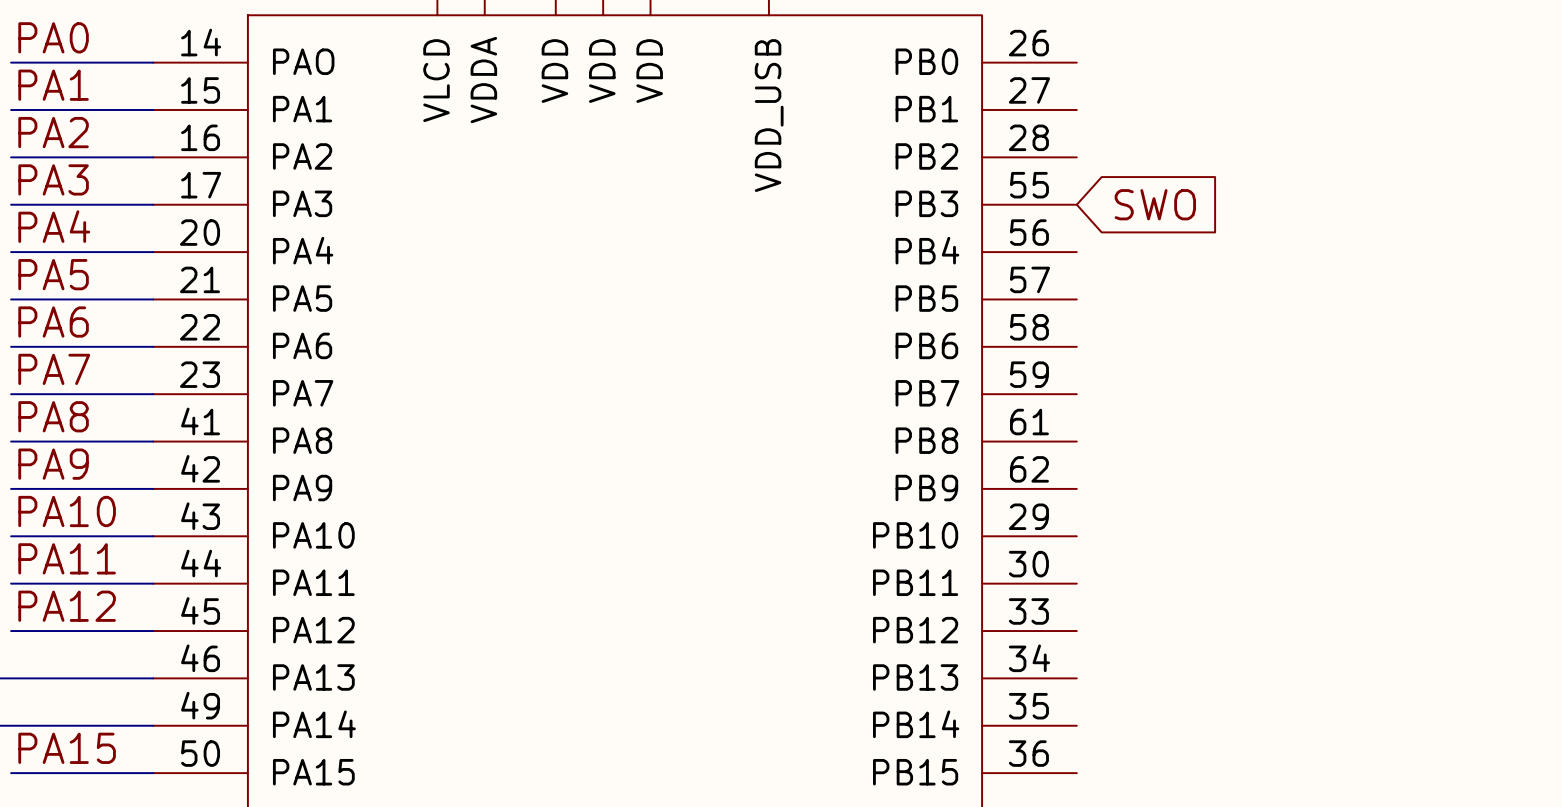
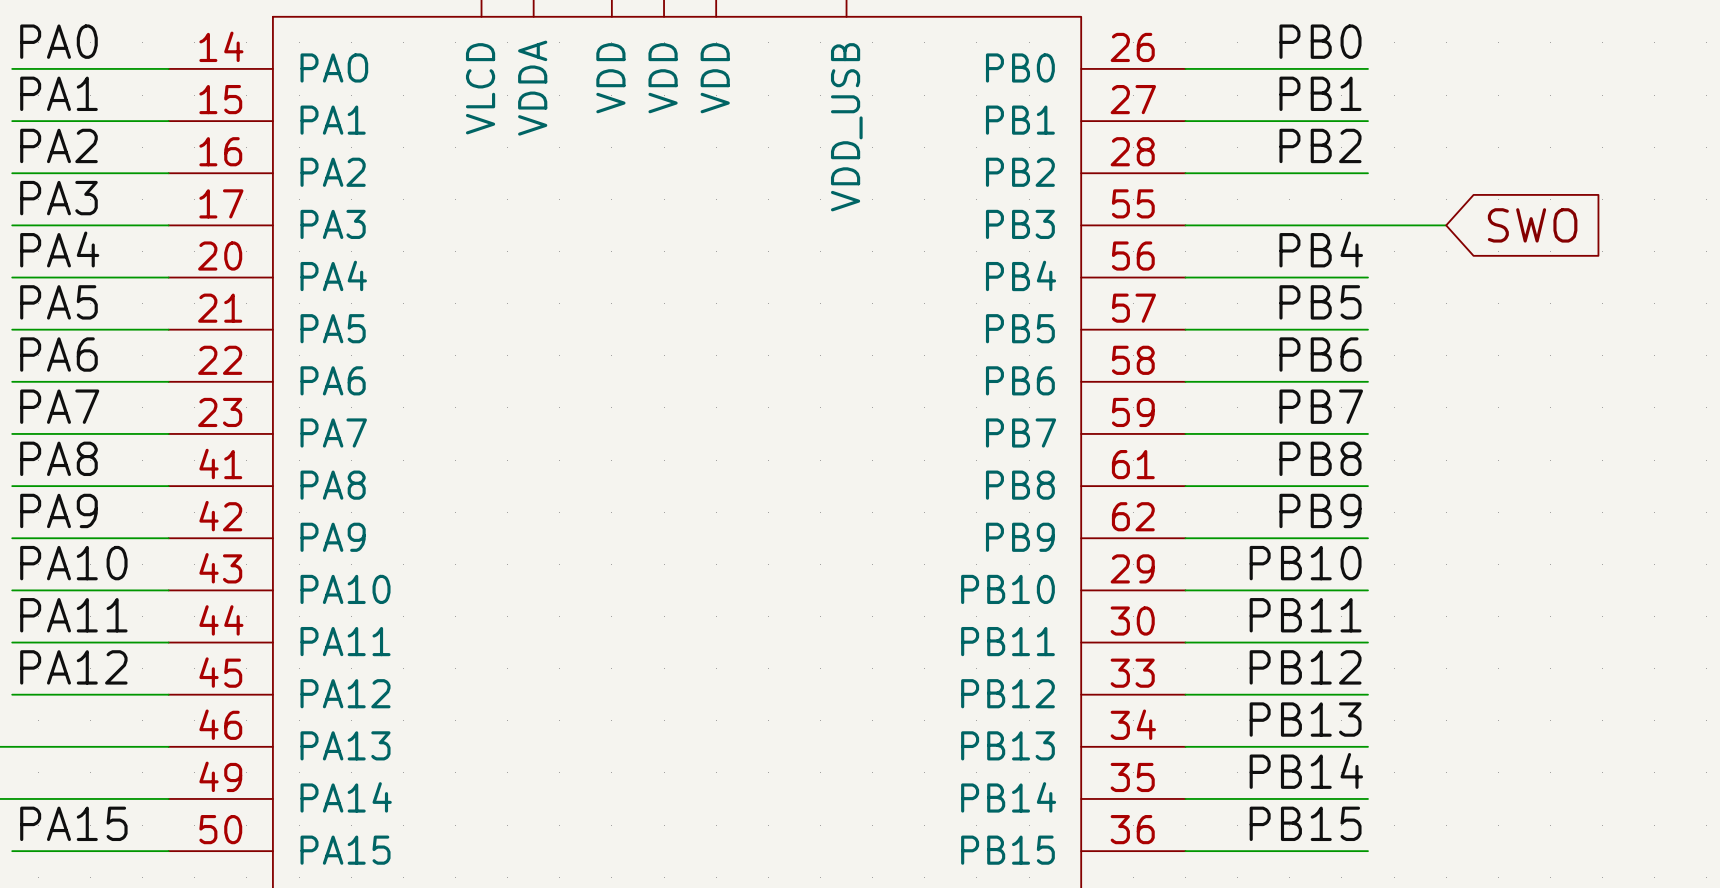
label: none -> PB0 (1320, 41)
wire: none -> (1185, 68) (1367, 68)
label: none -> PB1 (1320, 93)
wire: none -> (1185, 121) (1367, 121)
label: none -> PB2 (1320, 145)
wire: none -> (1185, 173) (1367, 173)
wire: none -> (1185, 225) (1446, 225)
global label position: SWO (1155, 204) -> SWO (1532, 225)
label: none -> PB4 (1321, 249)
wire: none -> (1185, 277) (1367, 277)
label: none -> PB5 (1320, 302)
wire: none -> (1185, 329) (1367, 329)
label: none -> PB6 (1320, 354)
wire: none -> (1185, 381) (1367, 381)
label: none -> PB7 (1321, 406)
wire: none -> (1185, 433) (1367, 433)
label: none -> PB8 (1320, 458)
wire: none -> (1185, 486) (1367, 486)
label: none -> PB9 (1320, 510)
wire: none -> (1185, 538) (1367, 538)
label: none -> PB10 (1305, 563)
wire: none -> (1185, 590) (1367, 590)
label: none -> PB11 (1305, 615)
wire: none -> (1185, 642) (1367, 642)
label: none -> PB12 (1305, 667)
wire: none -> (1185, 694) (1367, 694)
label: none -> PB13 (1305, 719)
wire: none -> (1185, 746) (1367, 746)
label: none -> PB14 (1306, 770)
wire: none -> (1185, 798) (1367, 798)
label: none -> PB15 (1305, 823)
wire: none -> (1185, 851) (1367, 851)

